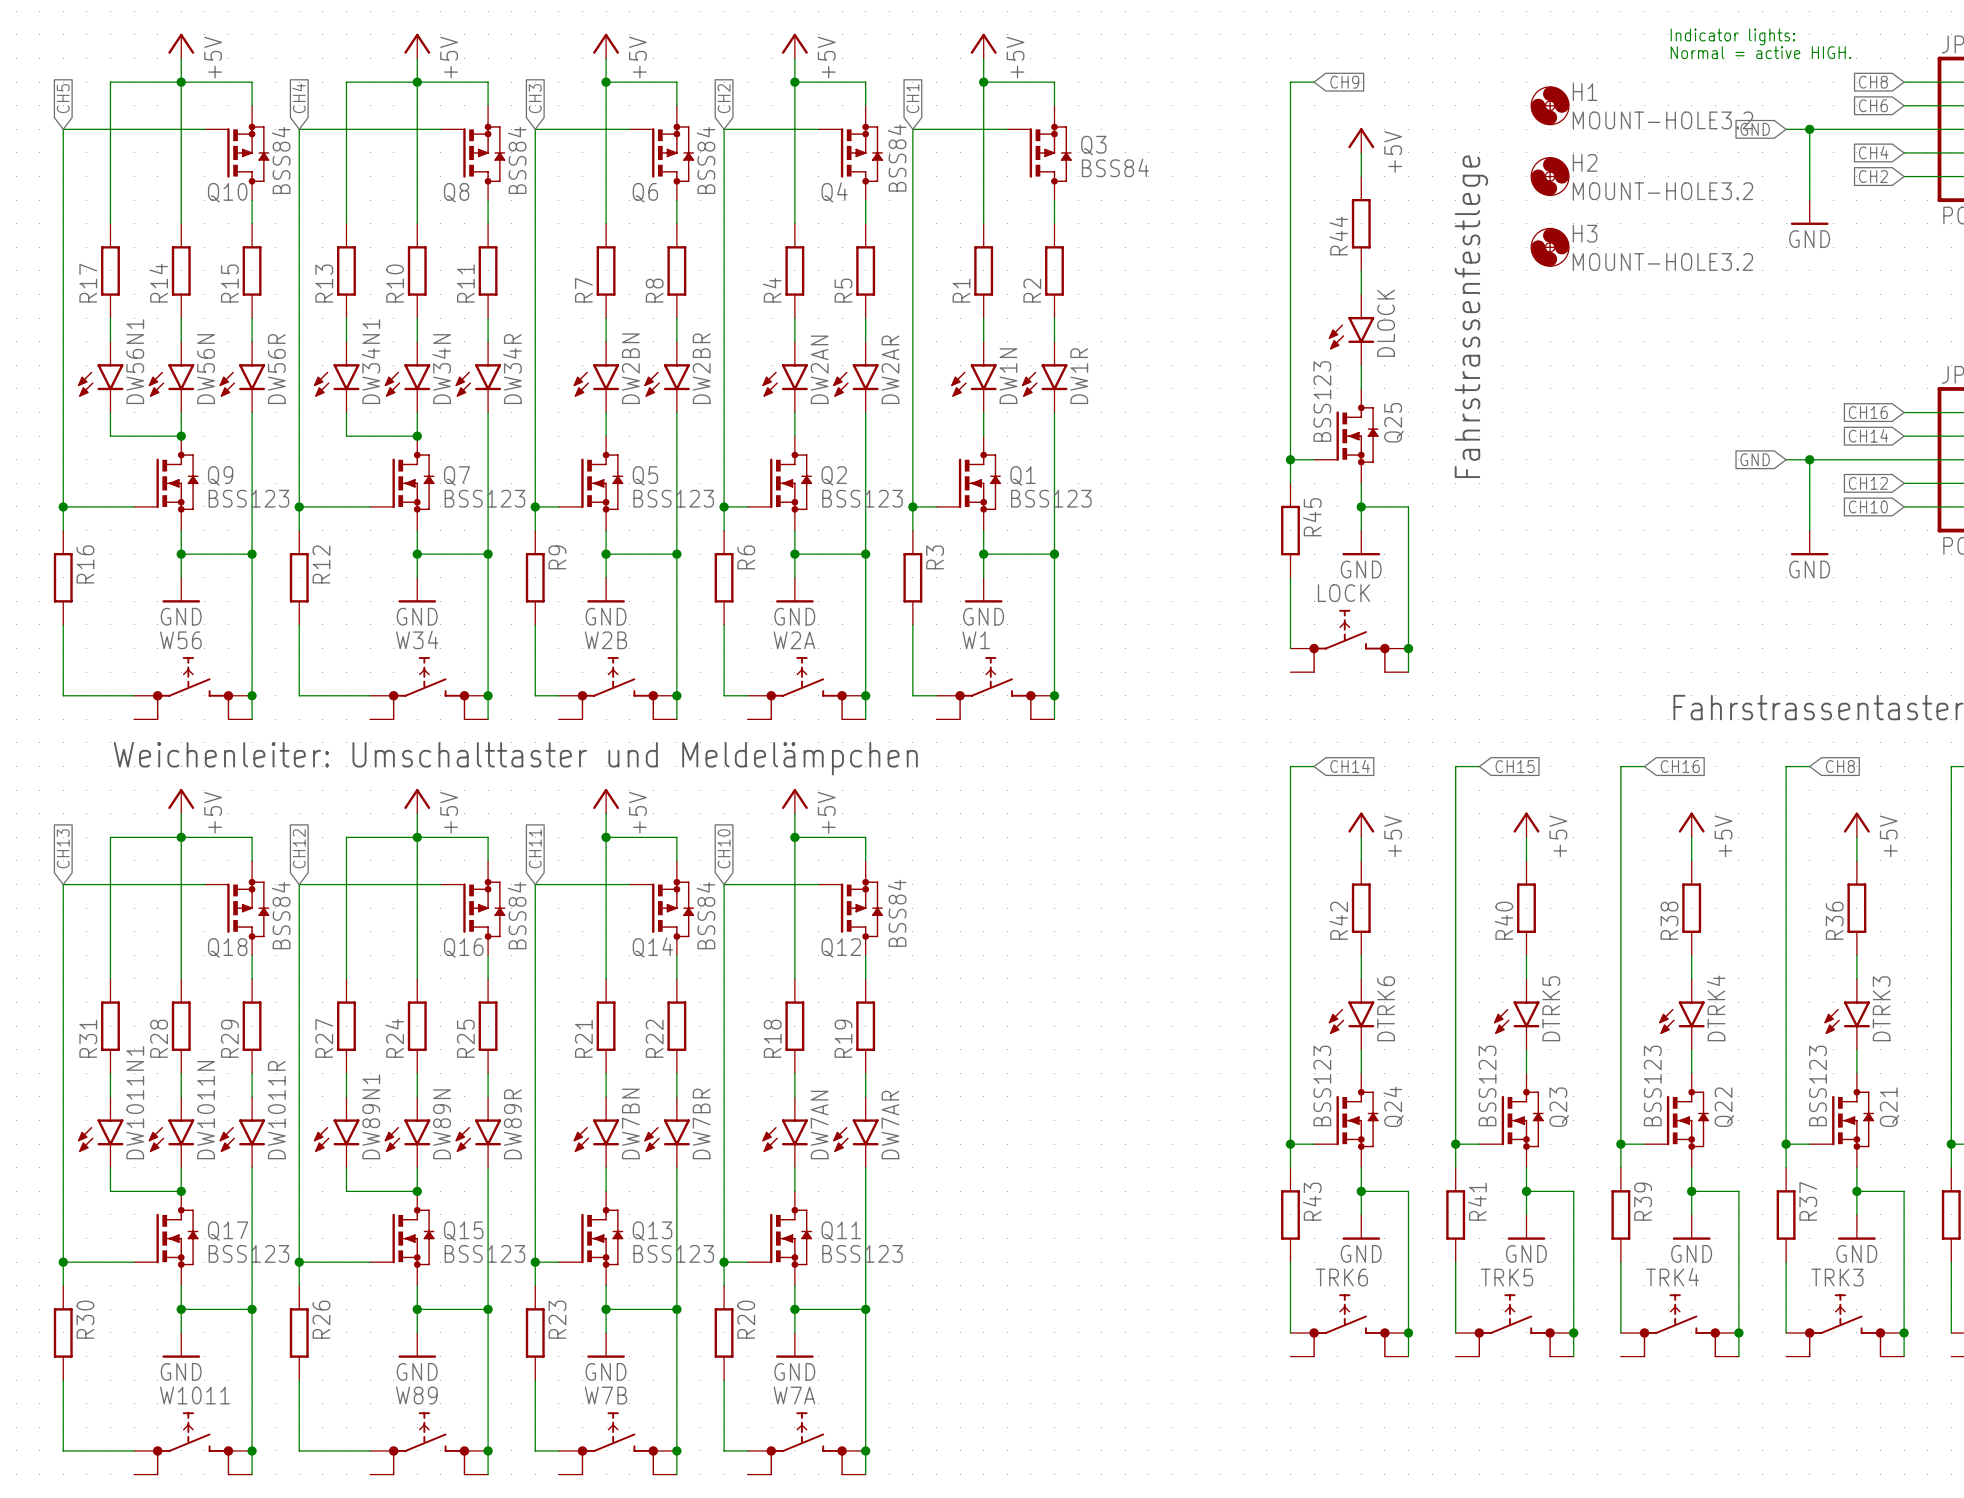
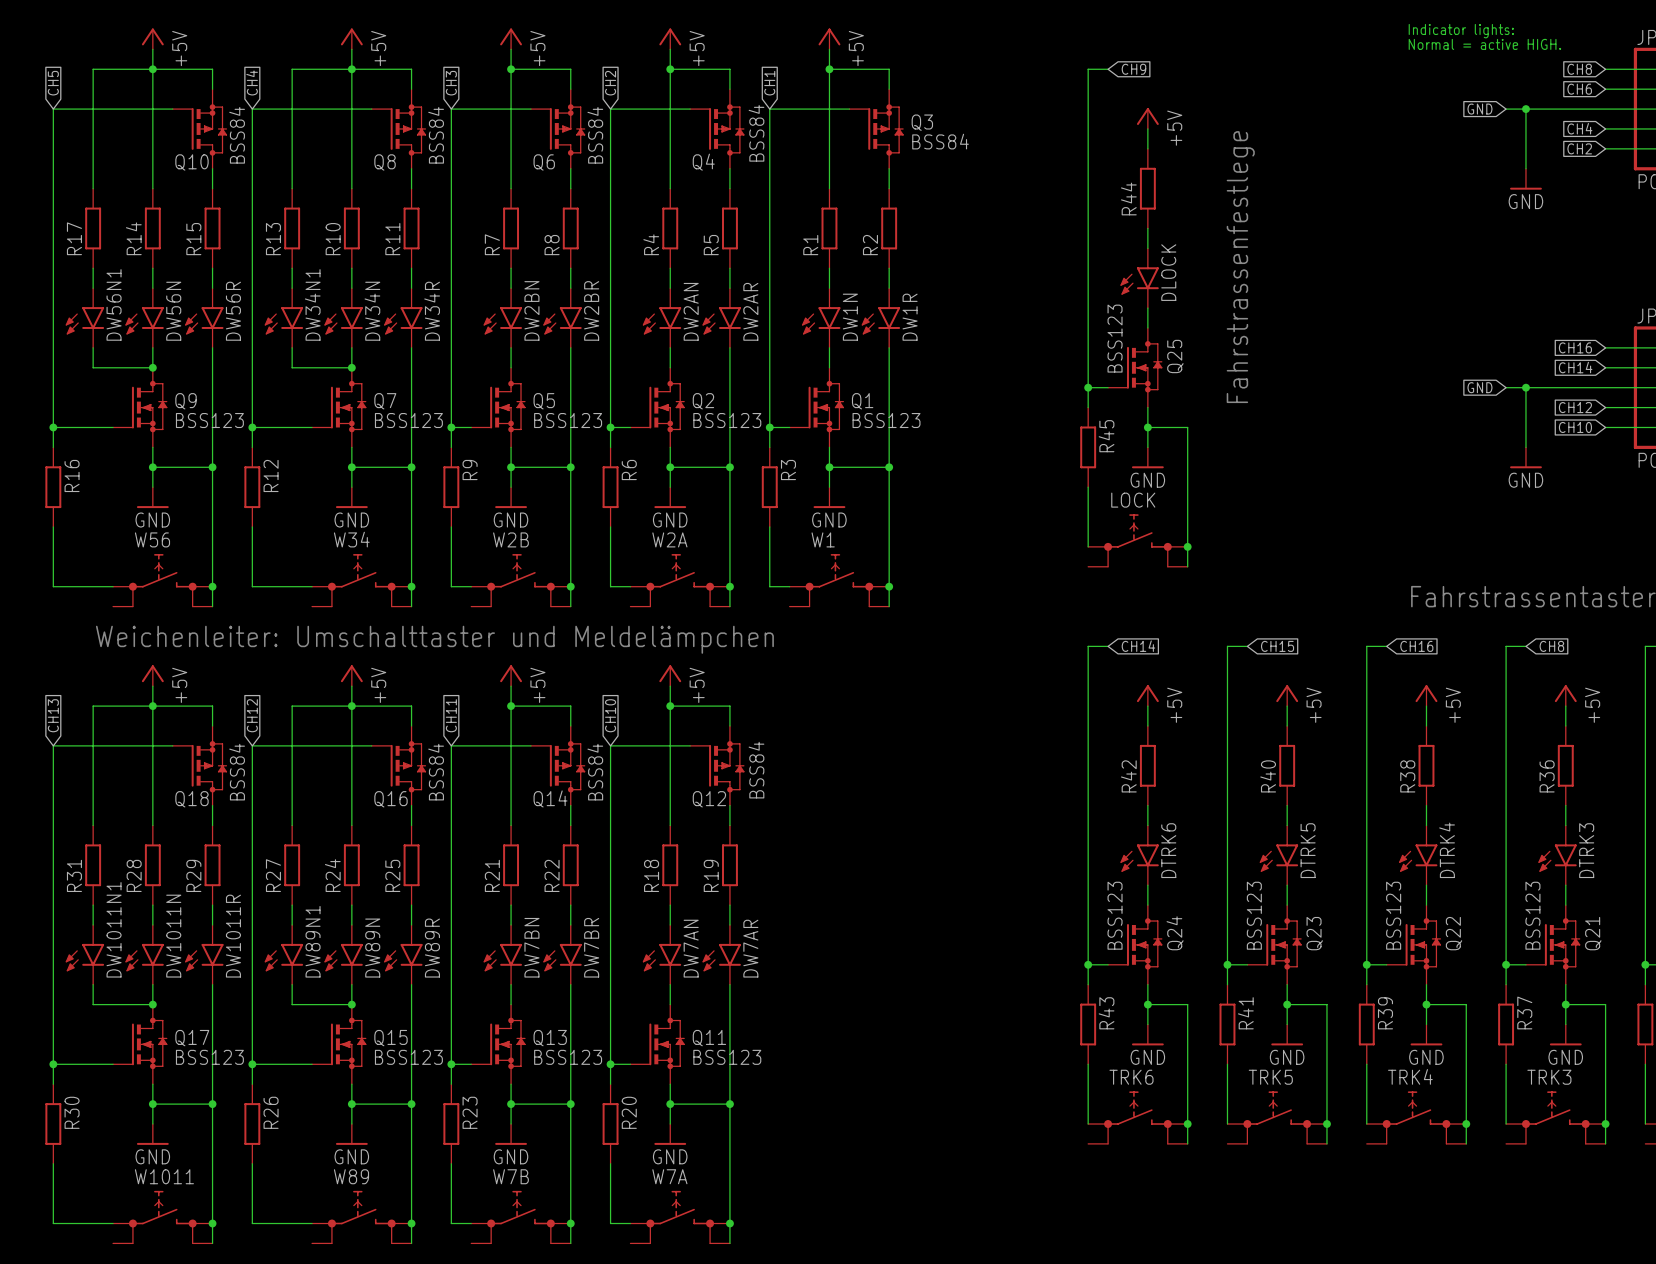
H1: MOUNT-HOLE3.2 (1550, 105) -> none
H2: MOUNT-HOLE3.2 (1550, 176) -> none
H3: MOUNT-HOLE3.2 (1550, 247) -> none

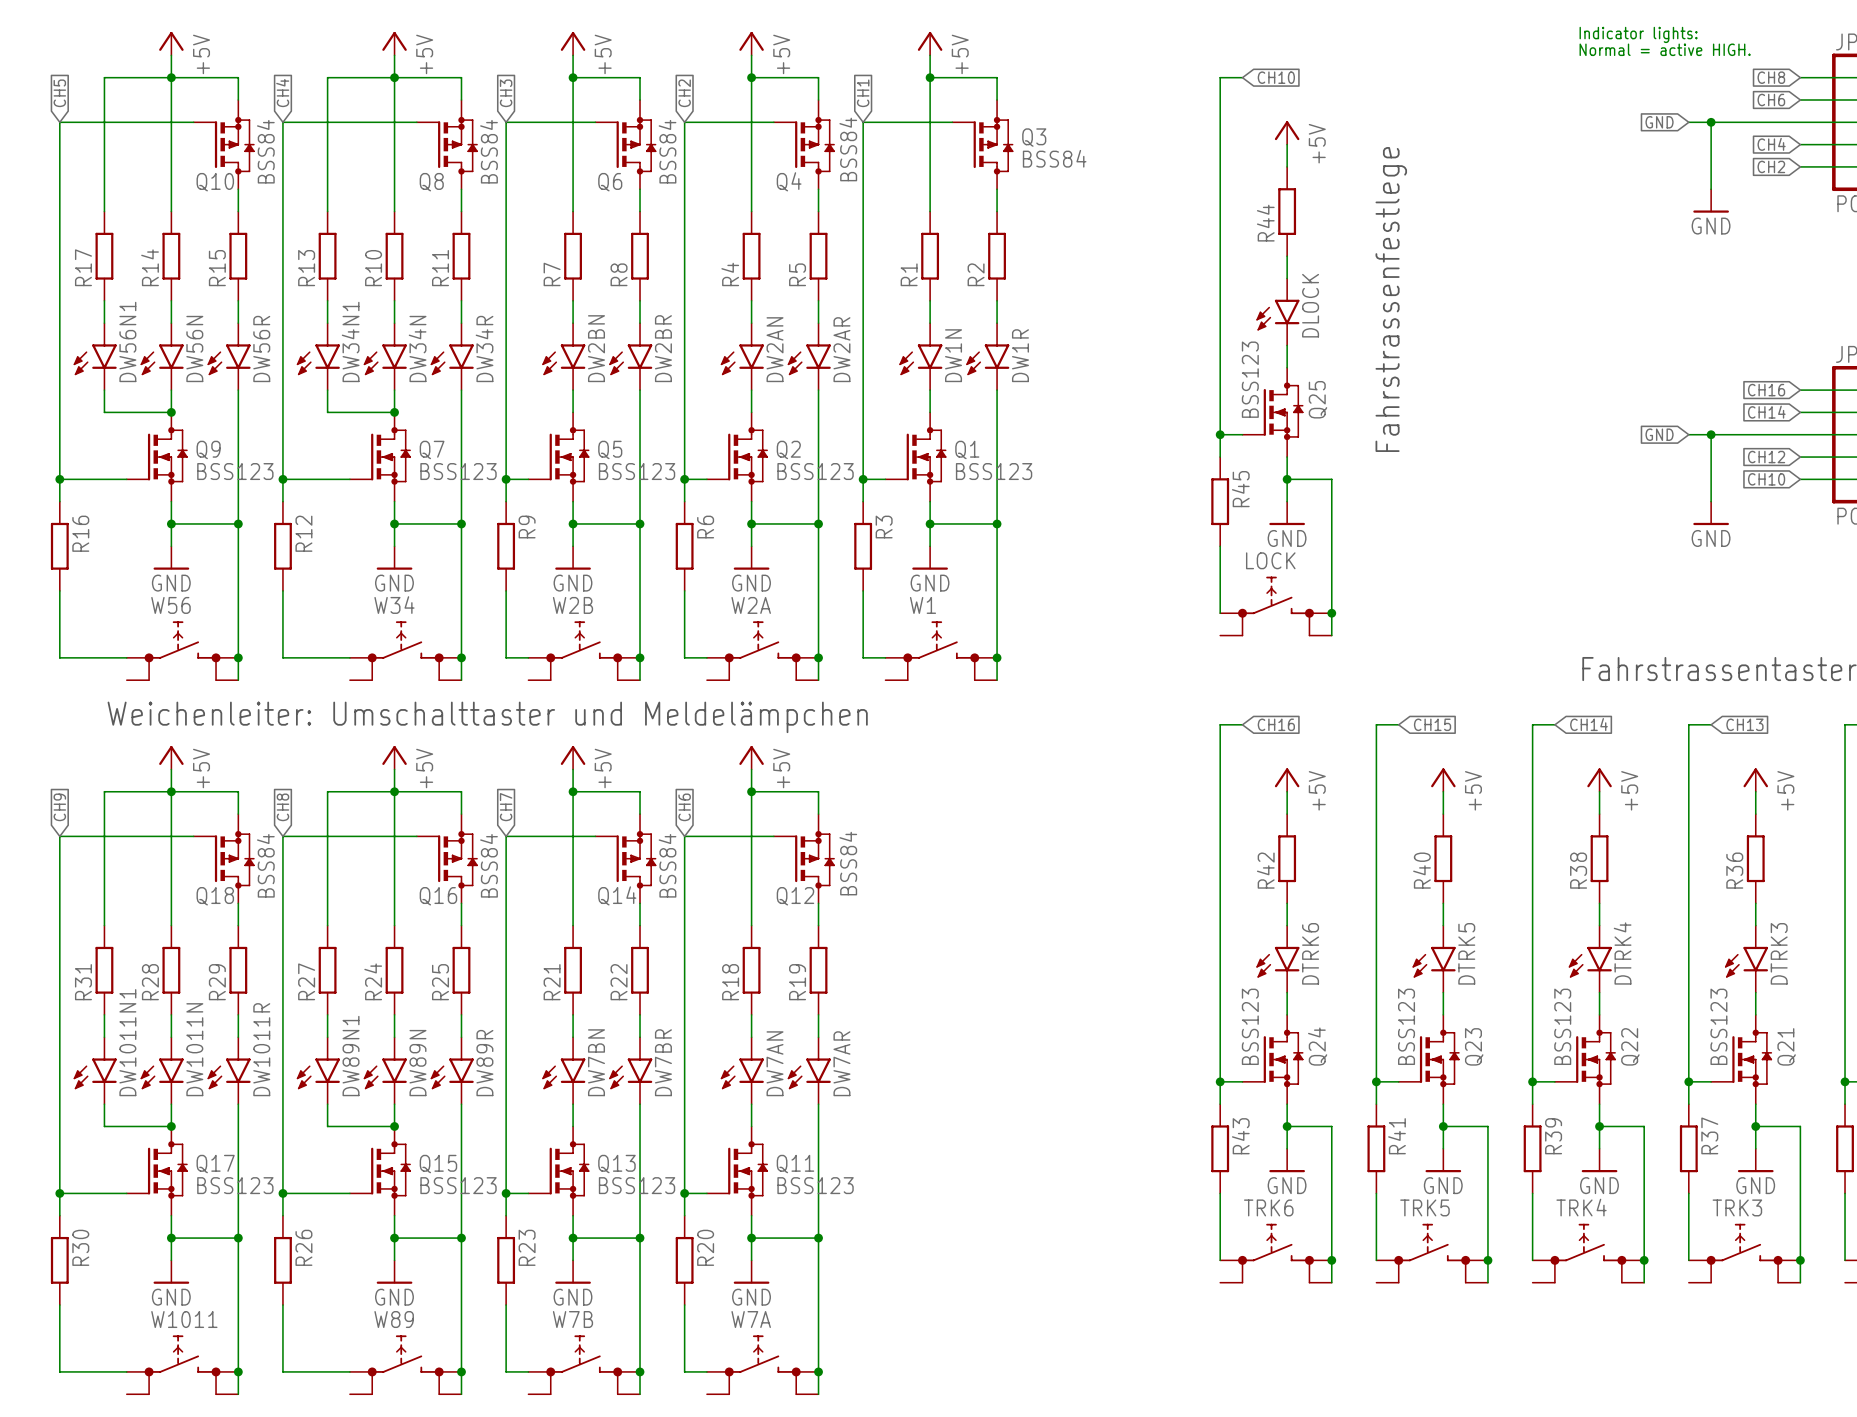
global label: CH9 (1133, 69) -> CH10 (1276, 77)
global label: CH14 (1138, 646) -> CH16 (1276, 724)
global label: CH16 (1416, 646) -> CH14 (1588, 724)
global label: CH8 (1551, 646) -> CH13 (1744, 724)
global label: CH13 (53, 715) -> CH9 (59, 807)
global label: CH12 (252, 715) -> CH8 (282, 807)
global label: CH11 (451, 715) -> CH7 (506, 807)
global label: CH10 (610, 715) -> CH6 (684, 807)

